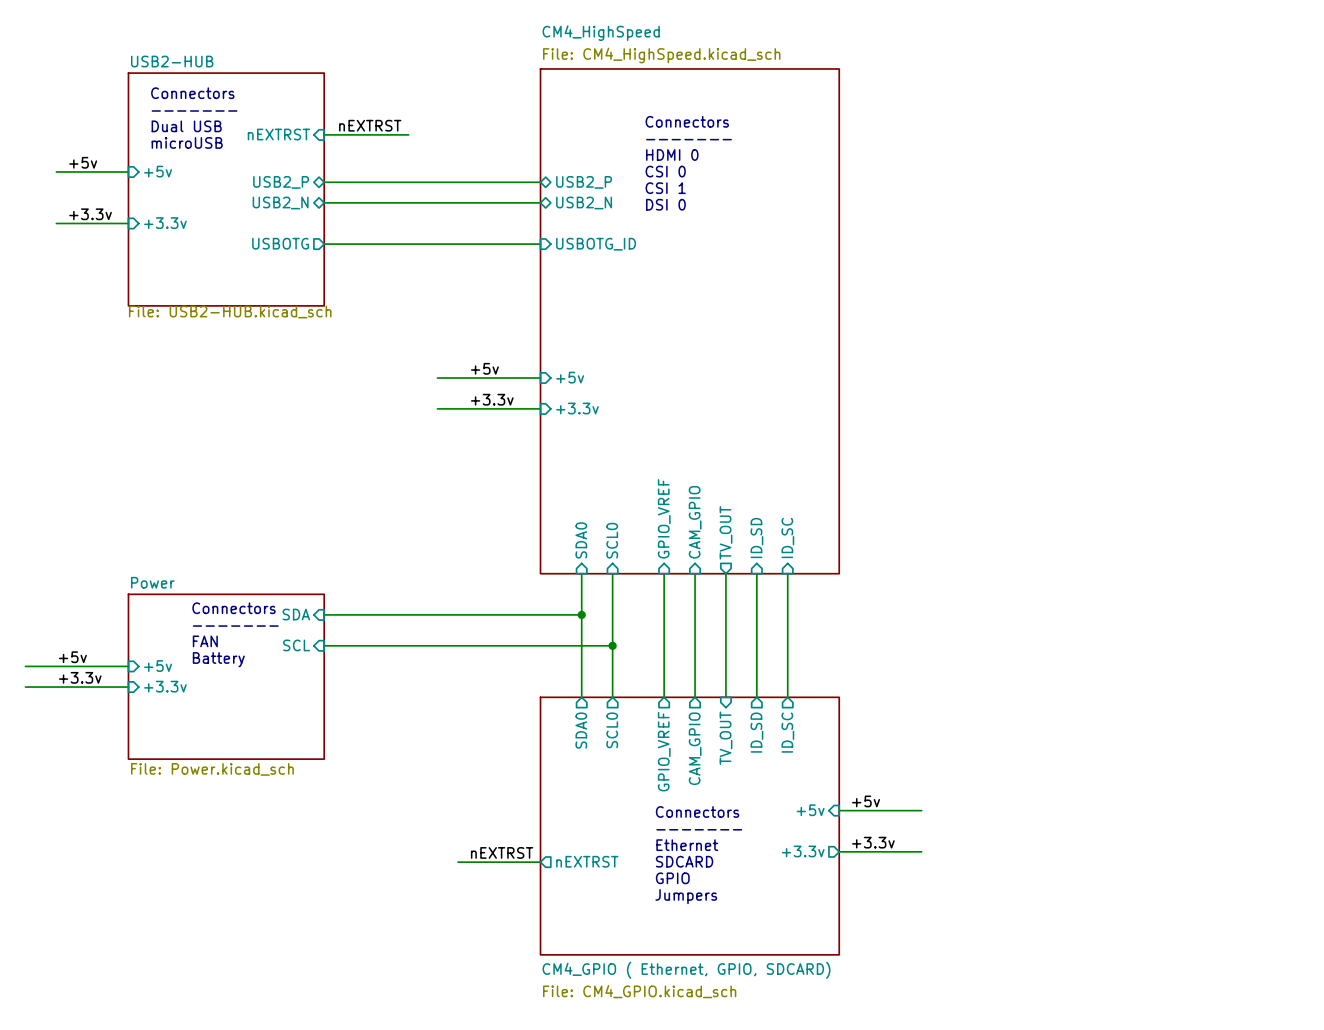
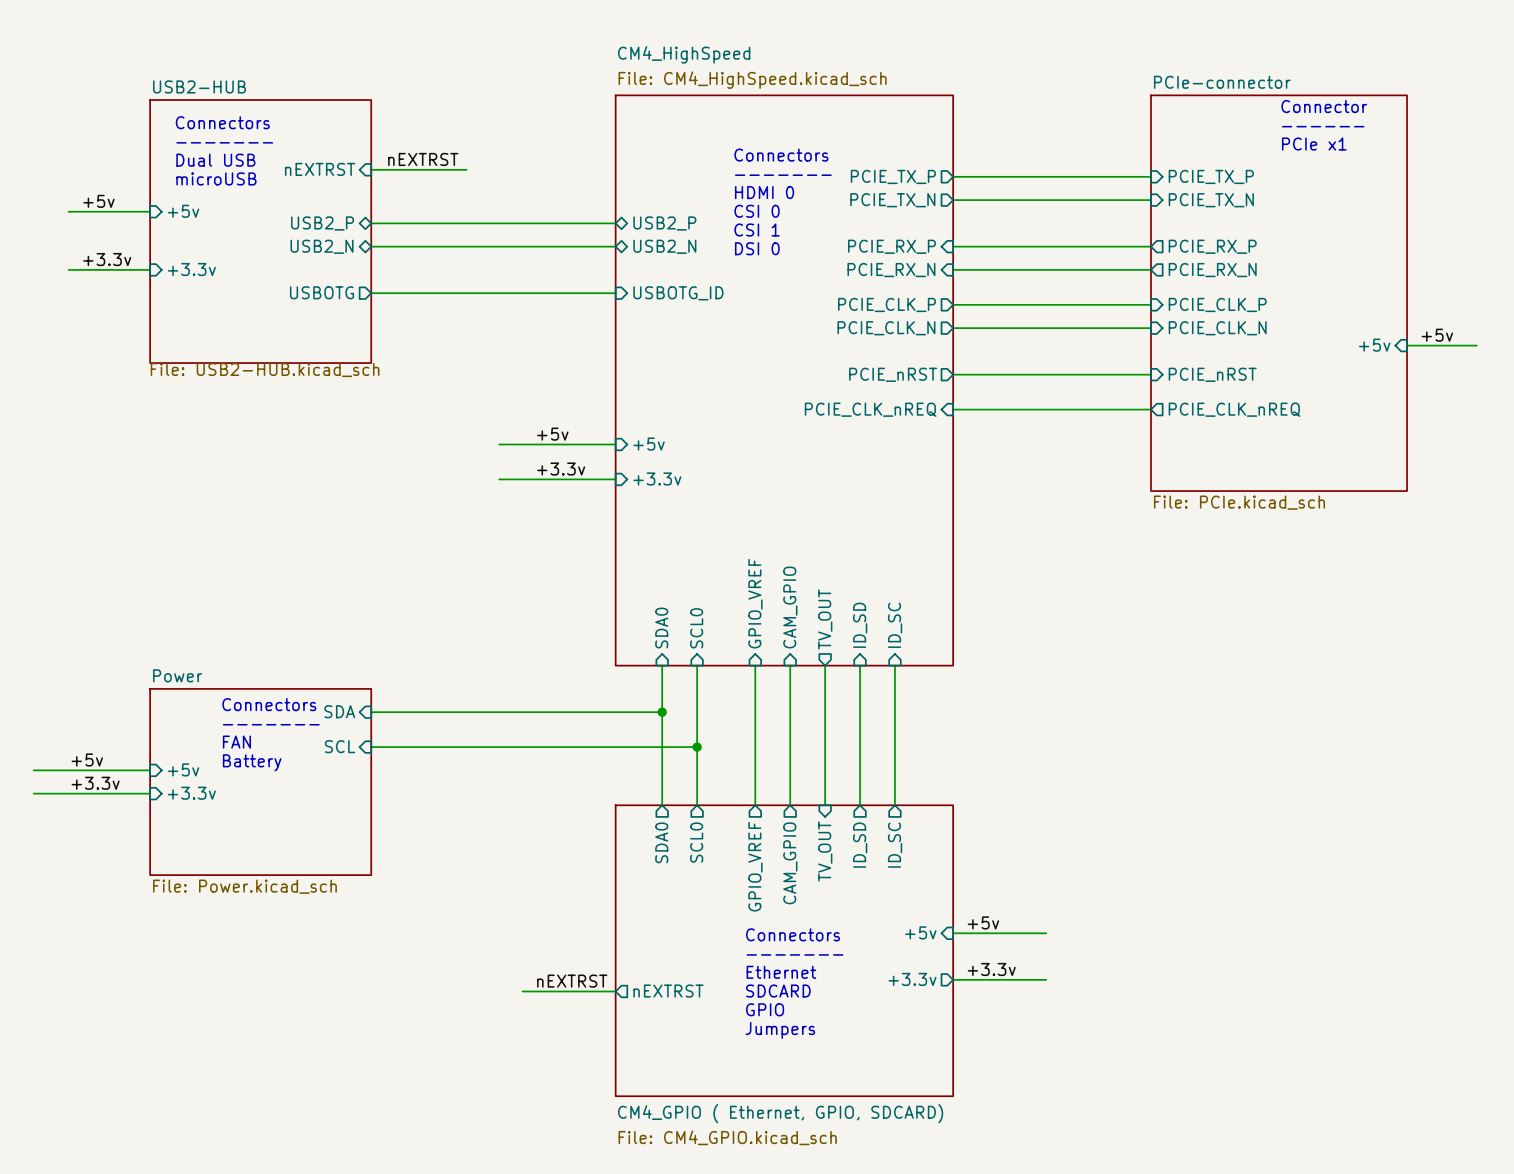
text: none -> Connector (1324, 106)
text: none -> ------ (1323, 126)
text: none -> PCIe x1 (1314, 144)
sheet pin: none -> PCIE_TX_P (893, 176)
wire: none -> (953, 176) (1150, 176)
sheet pin: none -> PCIE_TX_P (1211, 176)
sheet pin: none -> PCIE_TX_N (892, 200)
wire: none -> (953, 200) (1150, 200)
sheet pin: none -> PCIE_TX_N (1211, 200)
sheet pin: none -> PCIE_RX_P (892, 246)
wire: none -> (953, 246) (1150, 246)
sheet pin: none -> PCIE_RX_P (1212, 246)
sheet pin: none -> PCIE_RX_N (891, 270)
wire: none -> (953, 269) (1150, 269)
sheet pin: none -> PCIE_RX_N (1212, 270)
sheet PCIe-connector: none -> File: PCIe.kicad_sch (1279, 293)
sheet pin: none -> PCIE_CLK_P (887, 304)
wire: none -> (953, 304) (1150, 304)
sheet pin: none -> PCIE_CLK_P (1217, 304)
wire: none -> (953, 328) (1150, 328)
sheet pin: none -> PCIE_CLK_N (886, 328)
sheet pin: none -> PCIE_CLK_N (1217, 328)
label: none -> +5v (1437, 335)
sheet pin: none -> +5v (1374, 345)
wire: none -> (1407, 345) (1476, 345)
sheet pin: none -> PCIE_nRST (893, 374)
wire: none -> (953, 374) (1150, 374)
sheet pin: none -> PCIE_nRST (1212, 374)
sheet pin: none -> PCIE_CLK_nREQ (870, 409)
wire: none -> (953, 409) (1150, 409)
sheet pin: none -> PCIE_CLK_nREQ (1234, 409)

